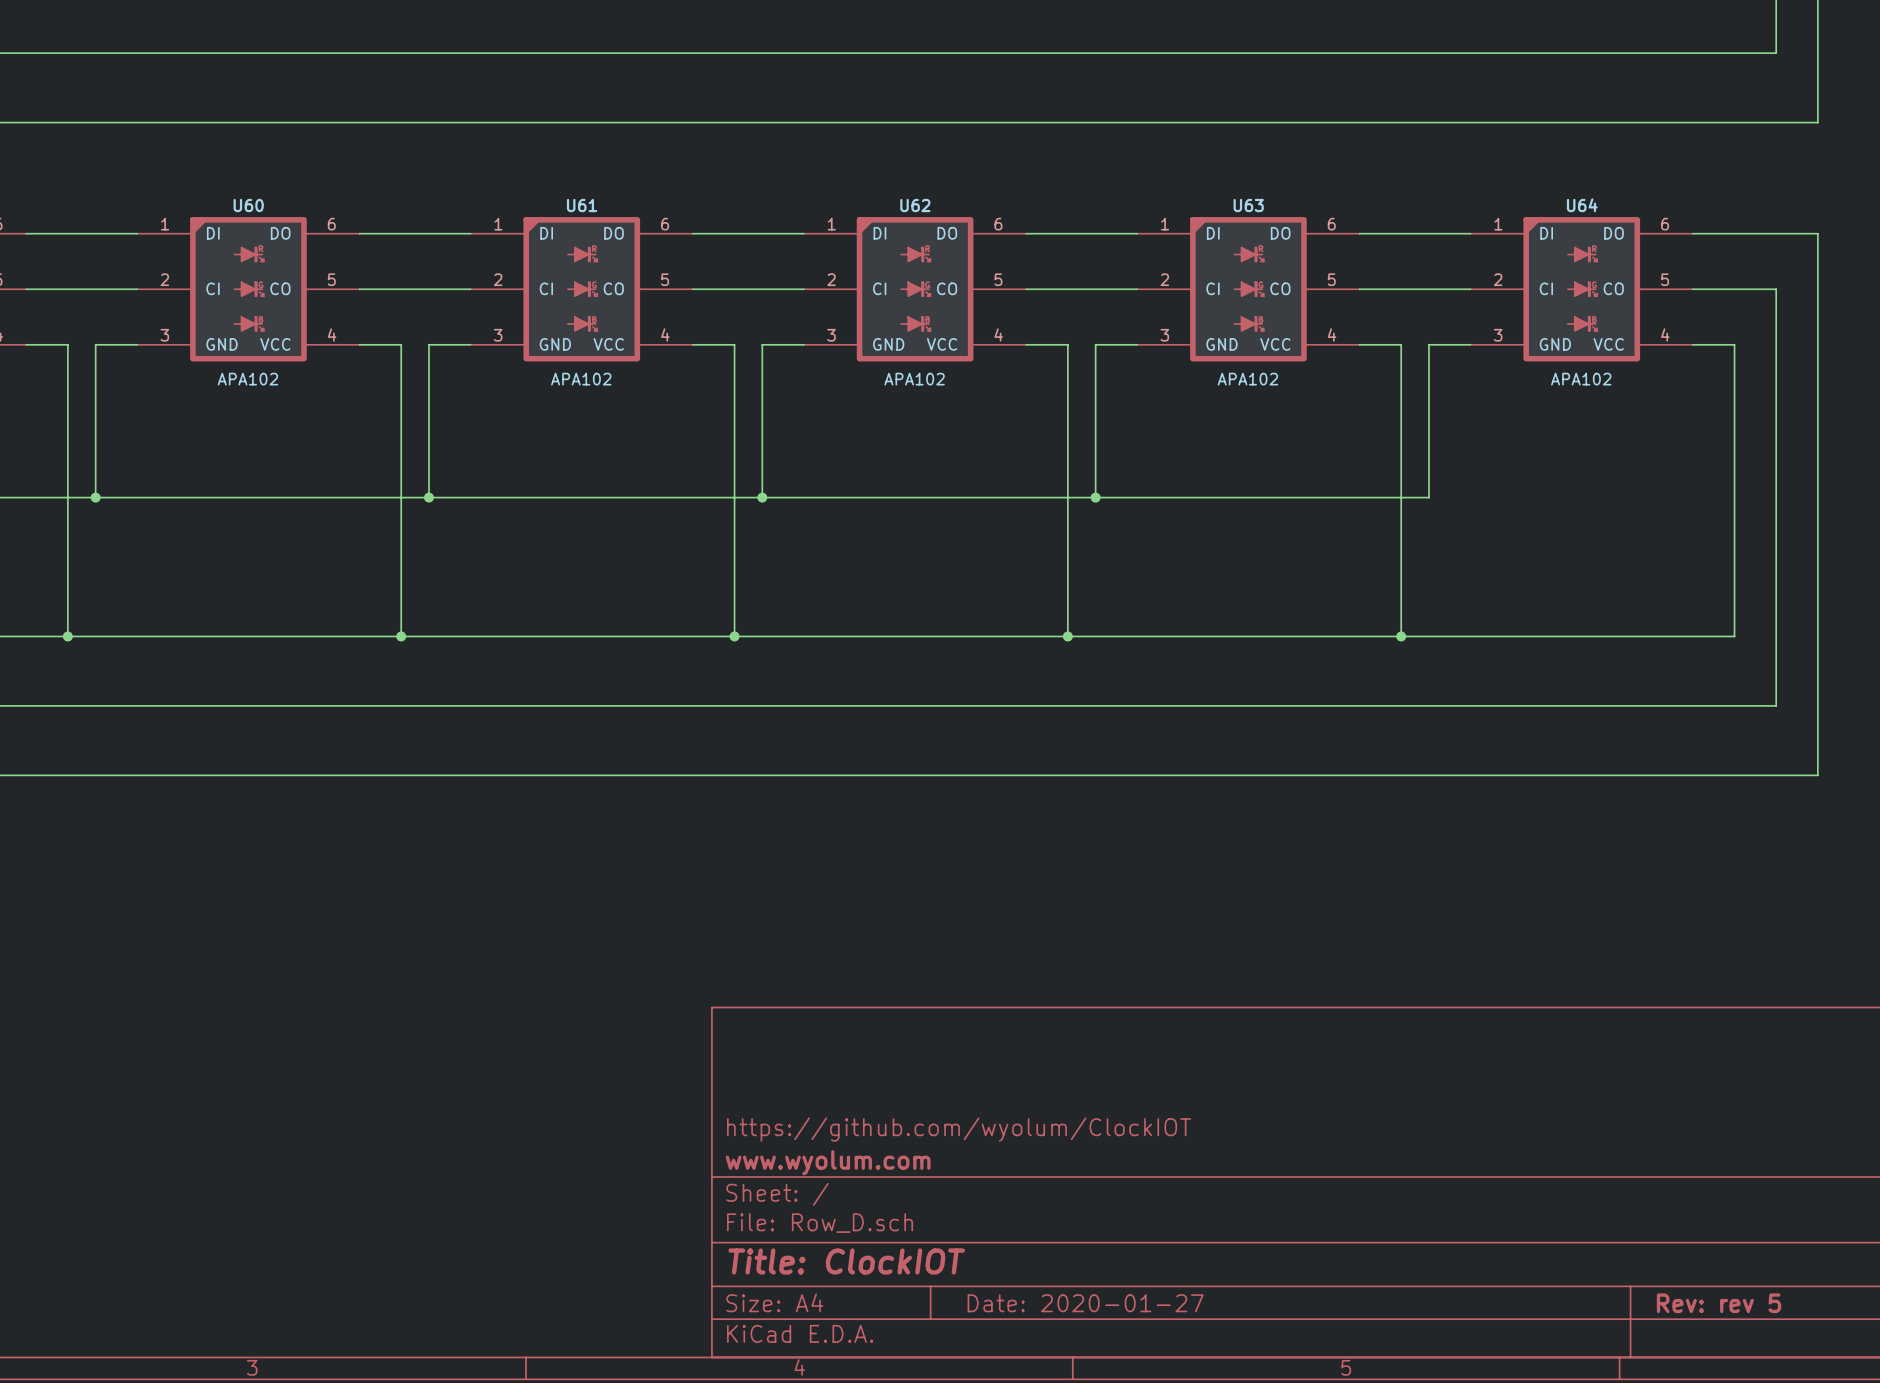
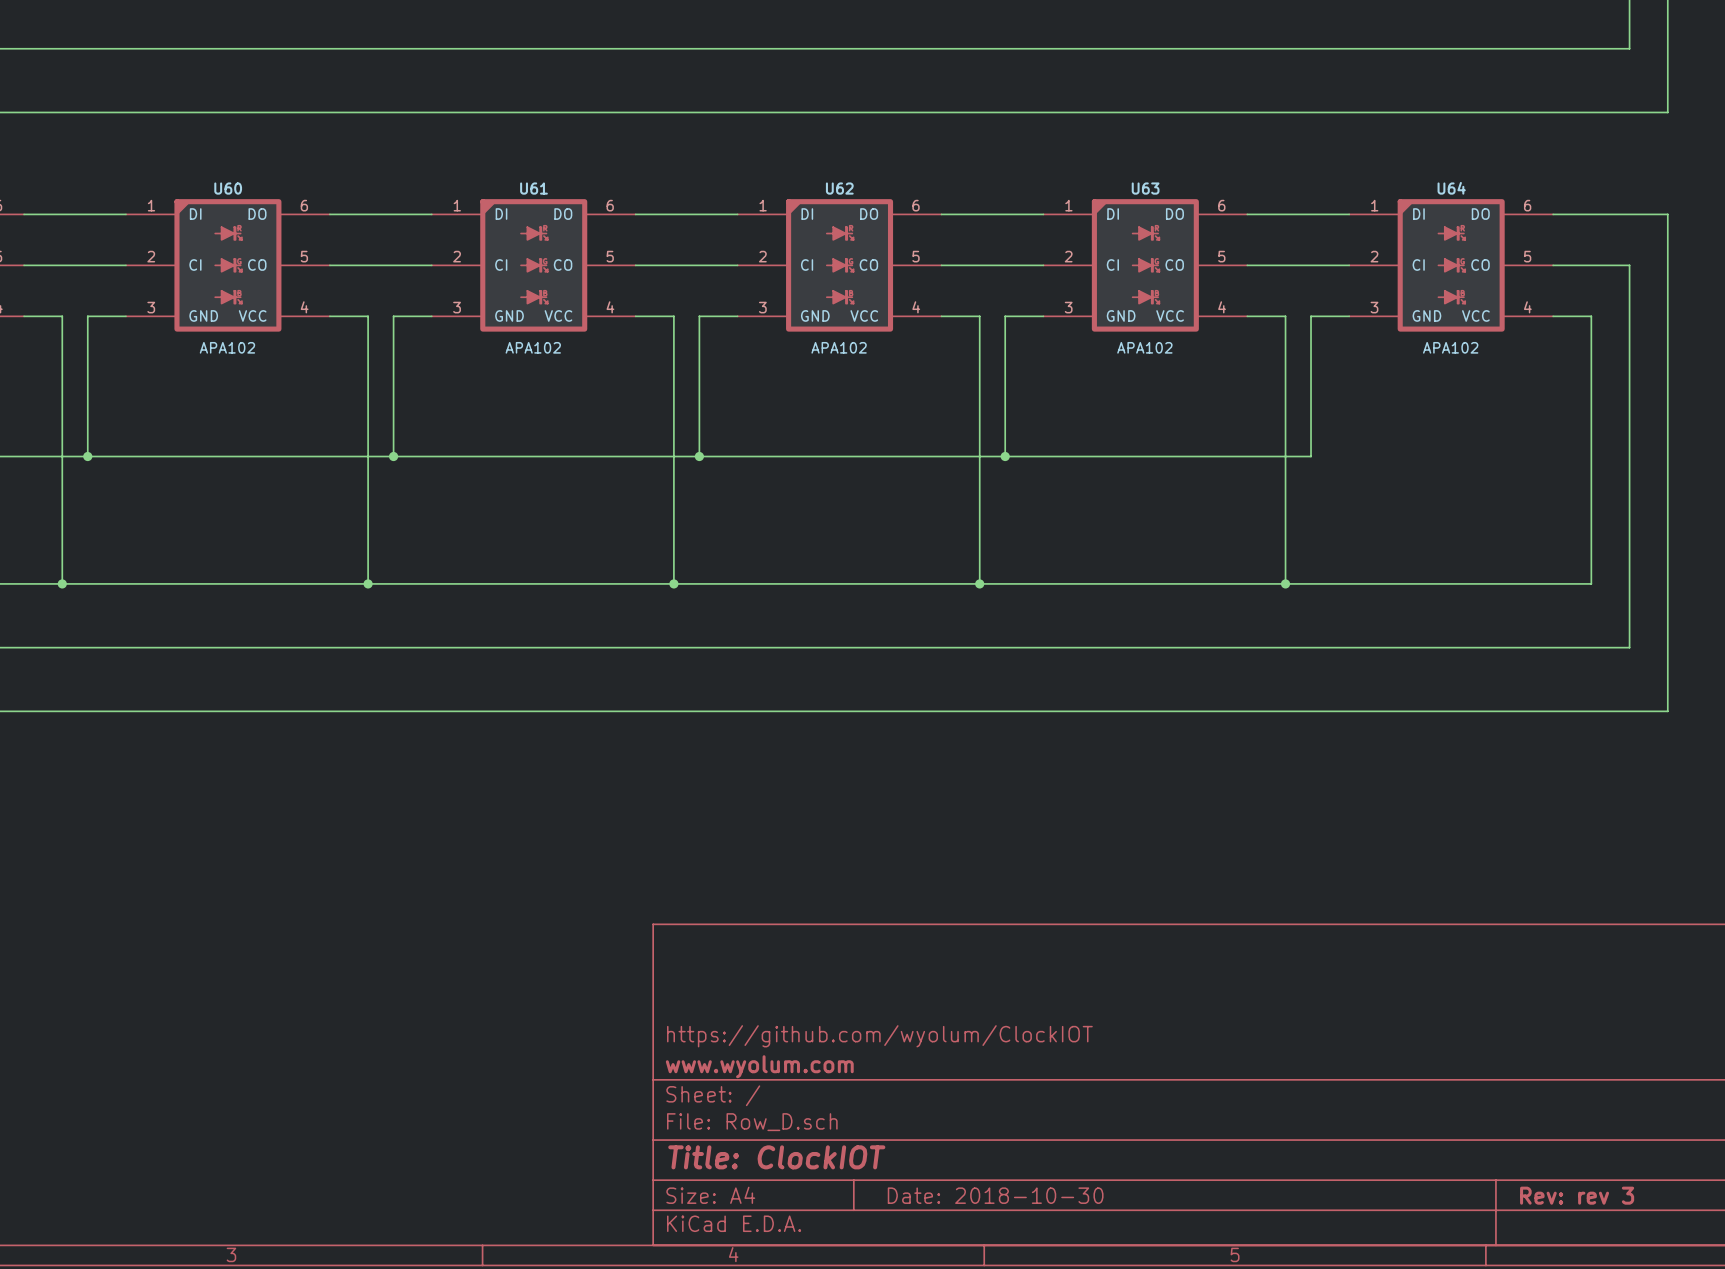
title block: Date: 2020-01-27 (1085, 1303) -> Date: 2018-10-30 (995, 1195)
title block: Rev: rev 5 (1719, 1303) -> Rev: rev 3 (1577, 1195)

